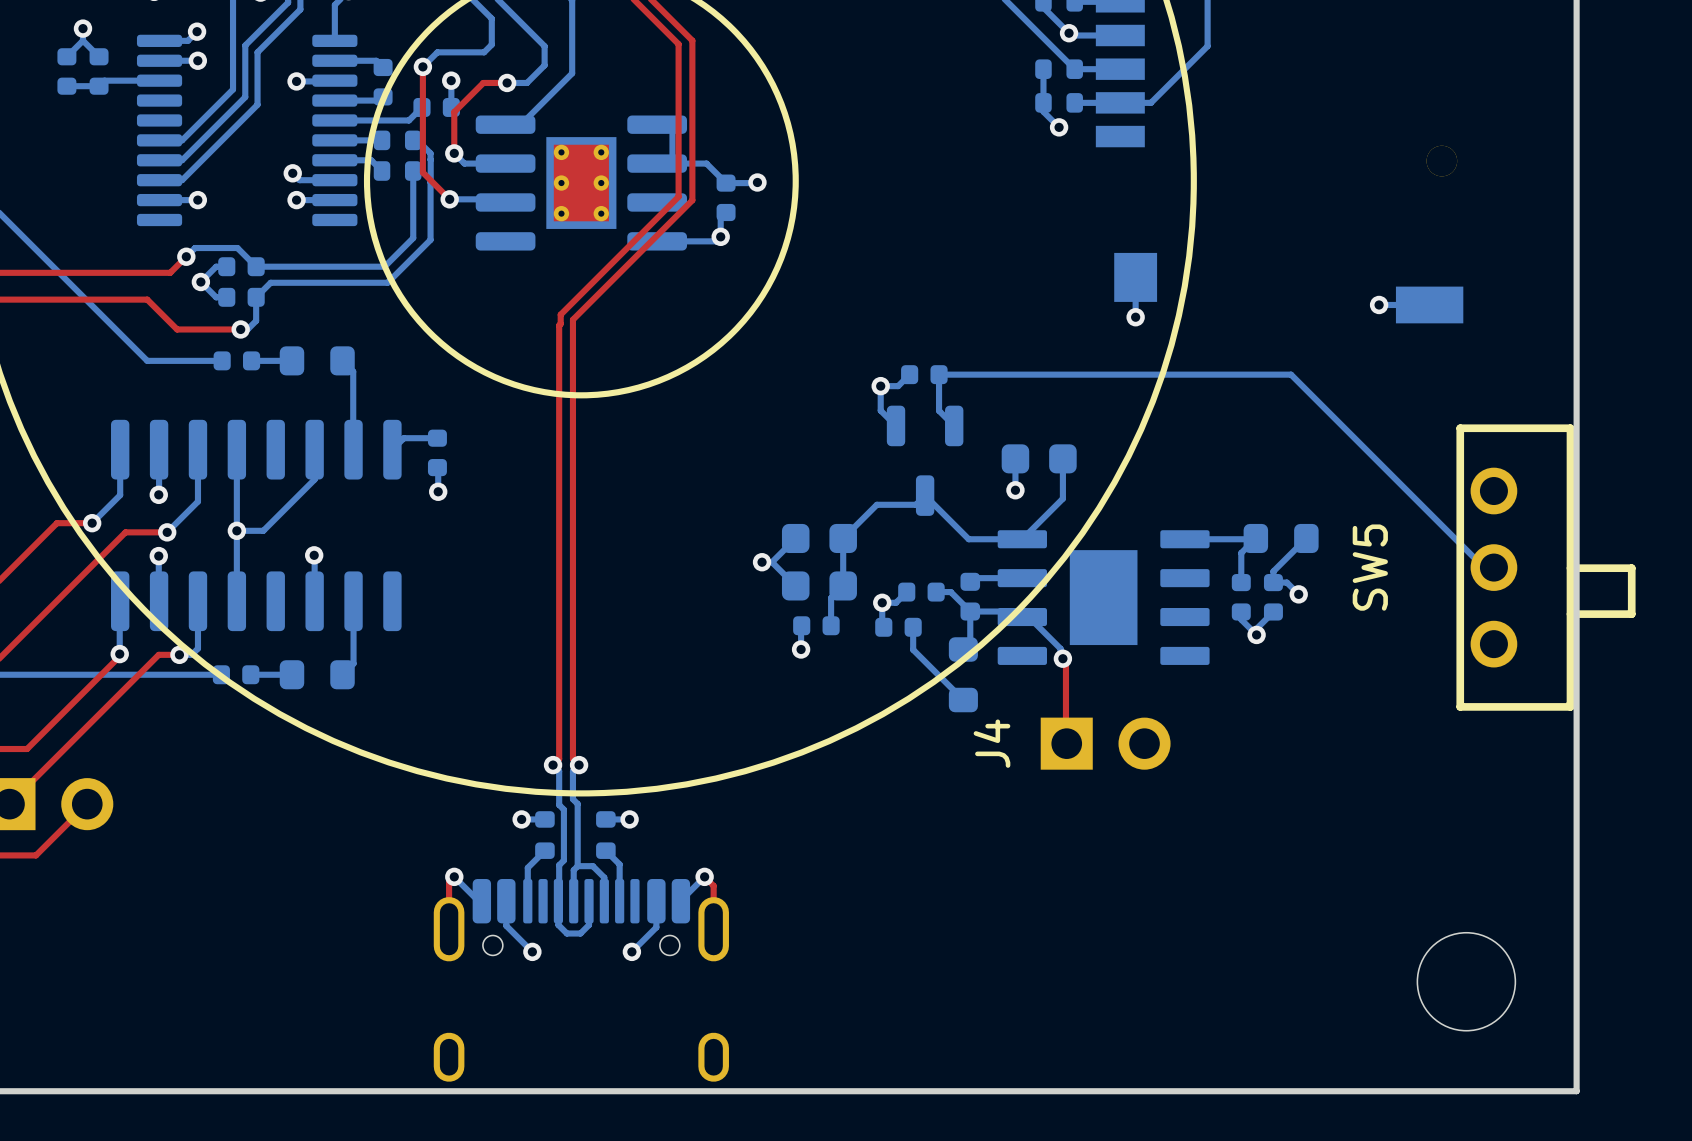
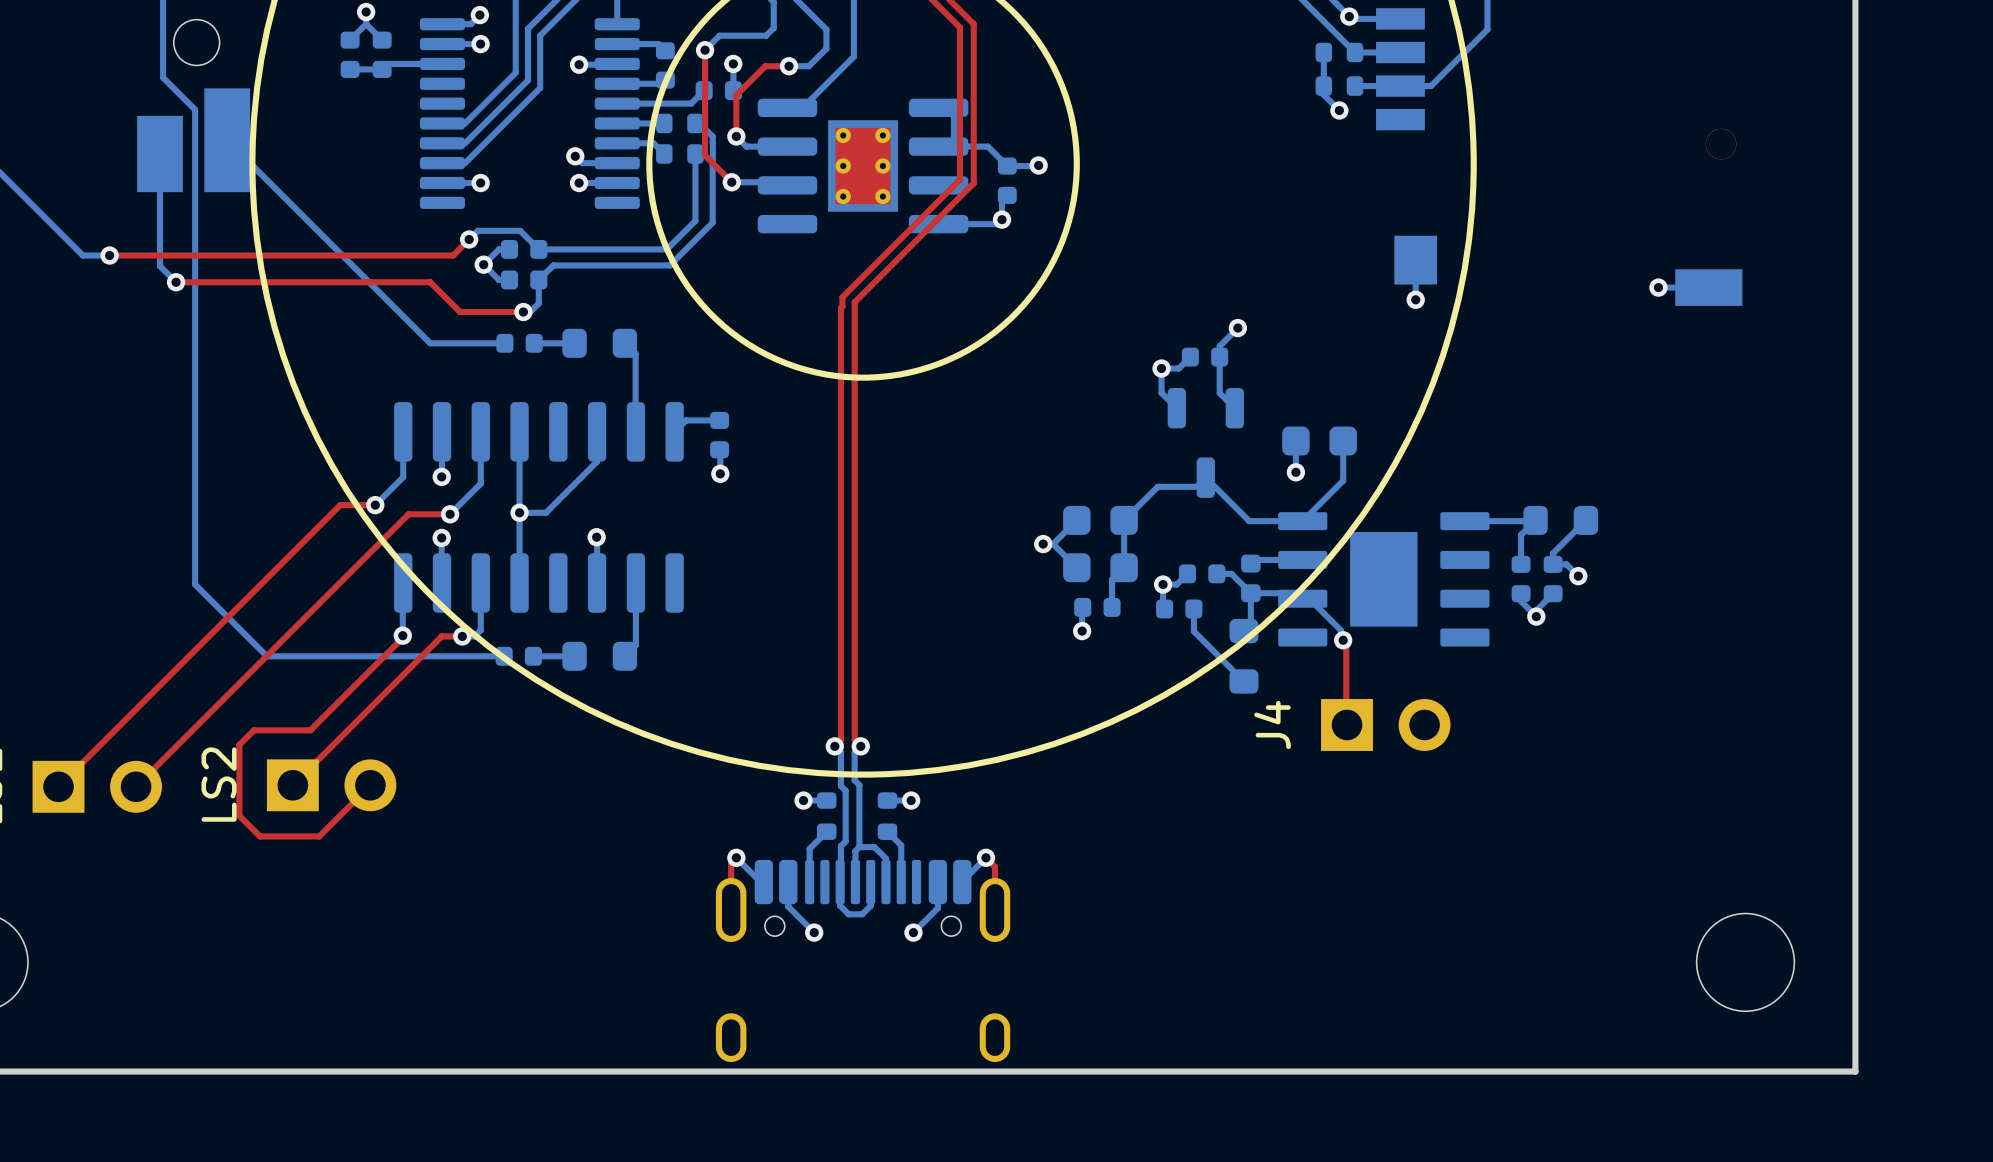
via: none -> (1237, 328)
bottom track: (939, 374) (1291, 374) (1483, 567) -> (1219, 357) (1219, 346) (1237, 328)
SW5: (1545, 567) -> none

